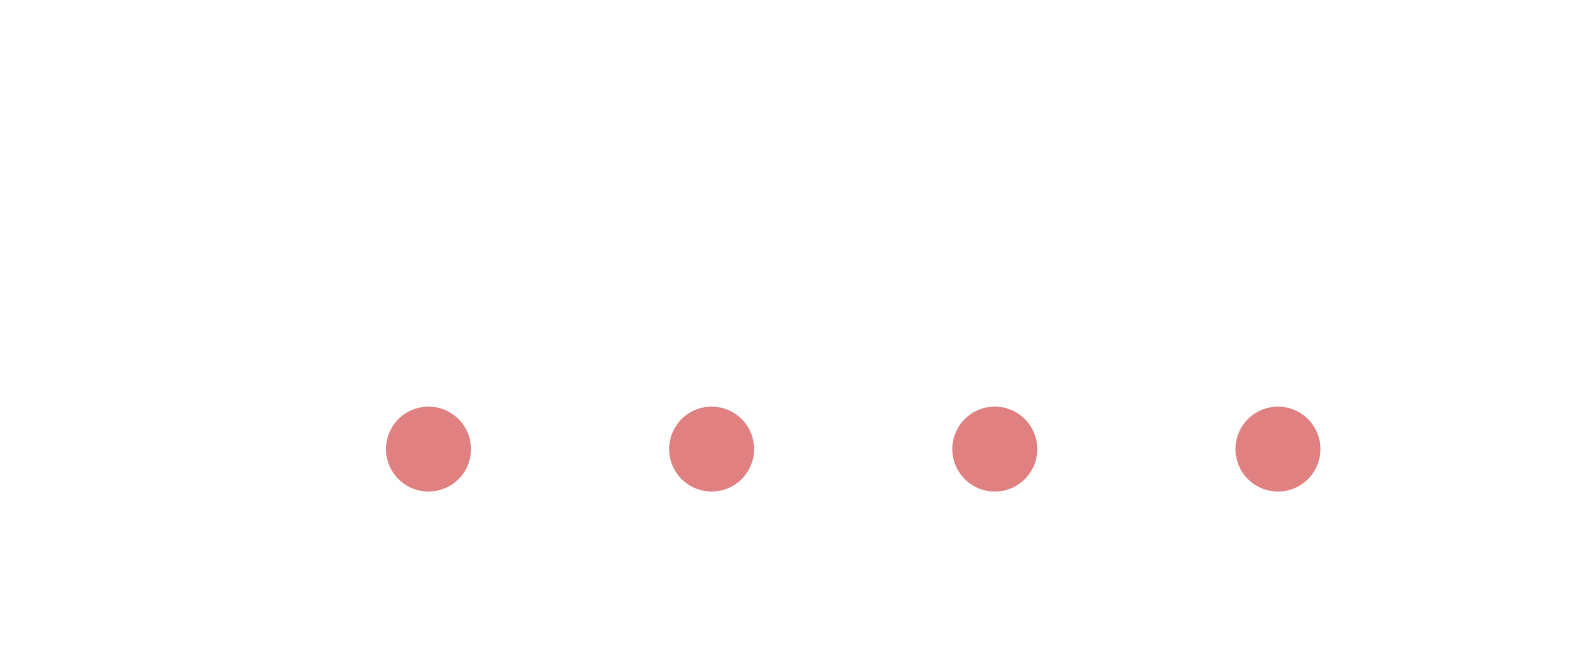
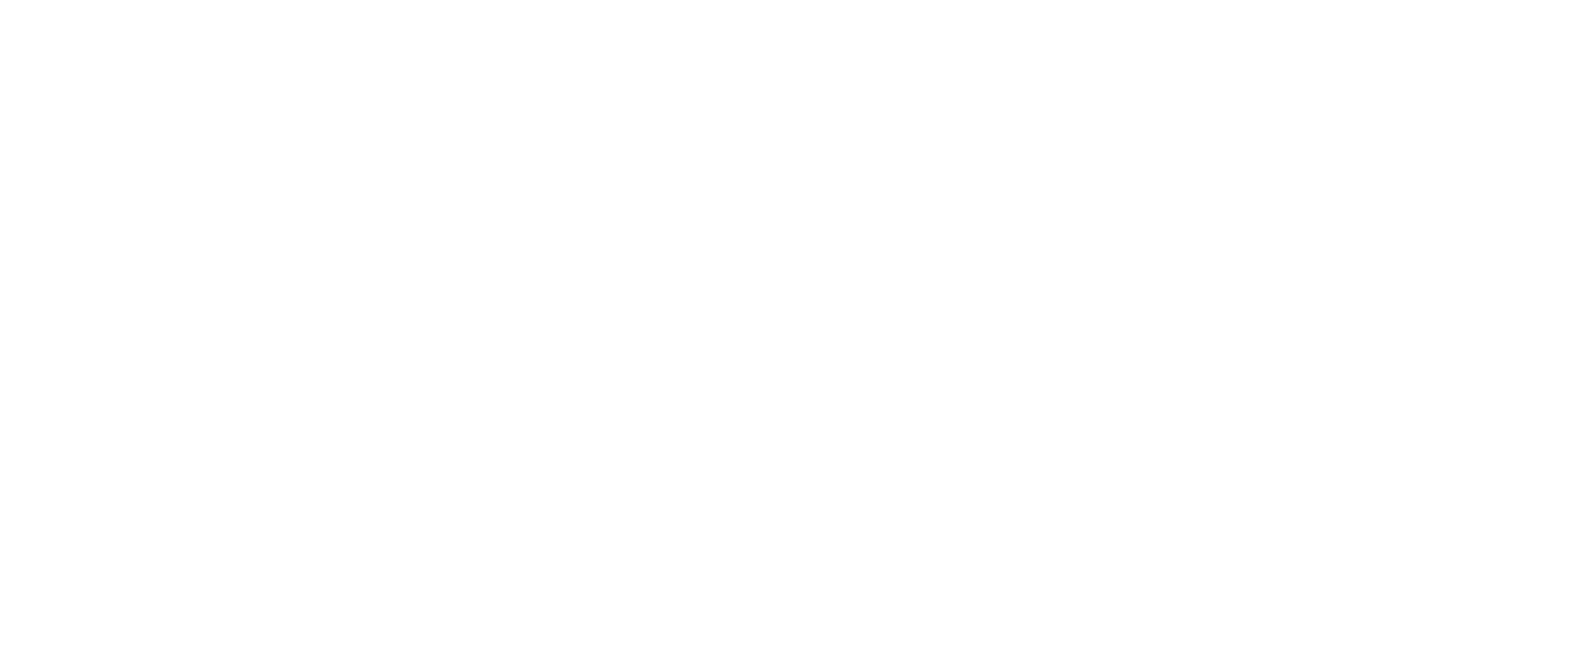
part: (428, 449) -> none
part: (711, 449) -> none
part: (994, 449) -> none
part: (1277, 449) -> none

